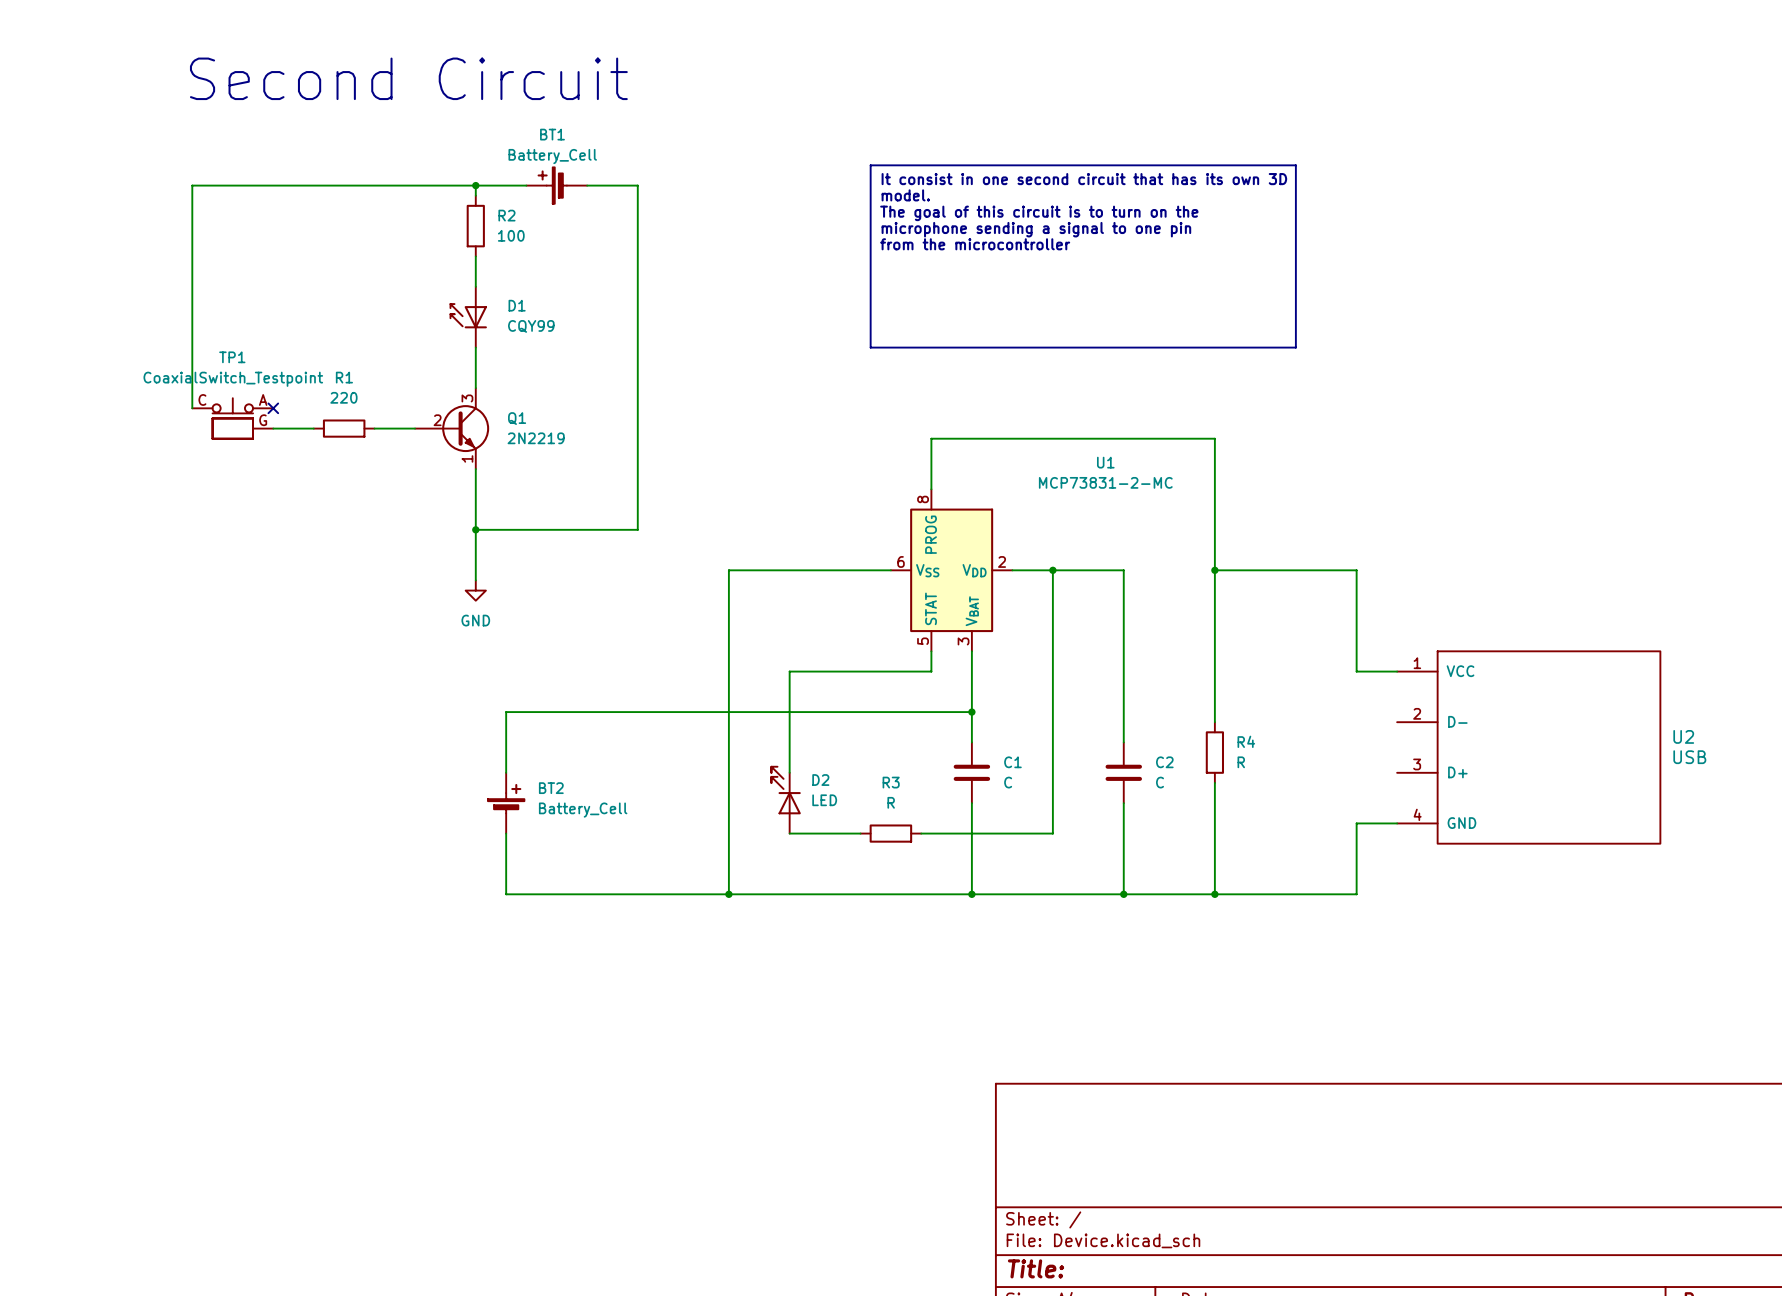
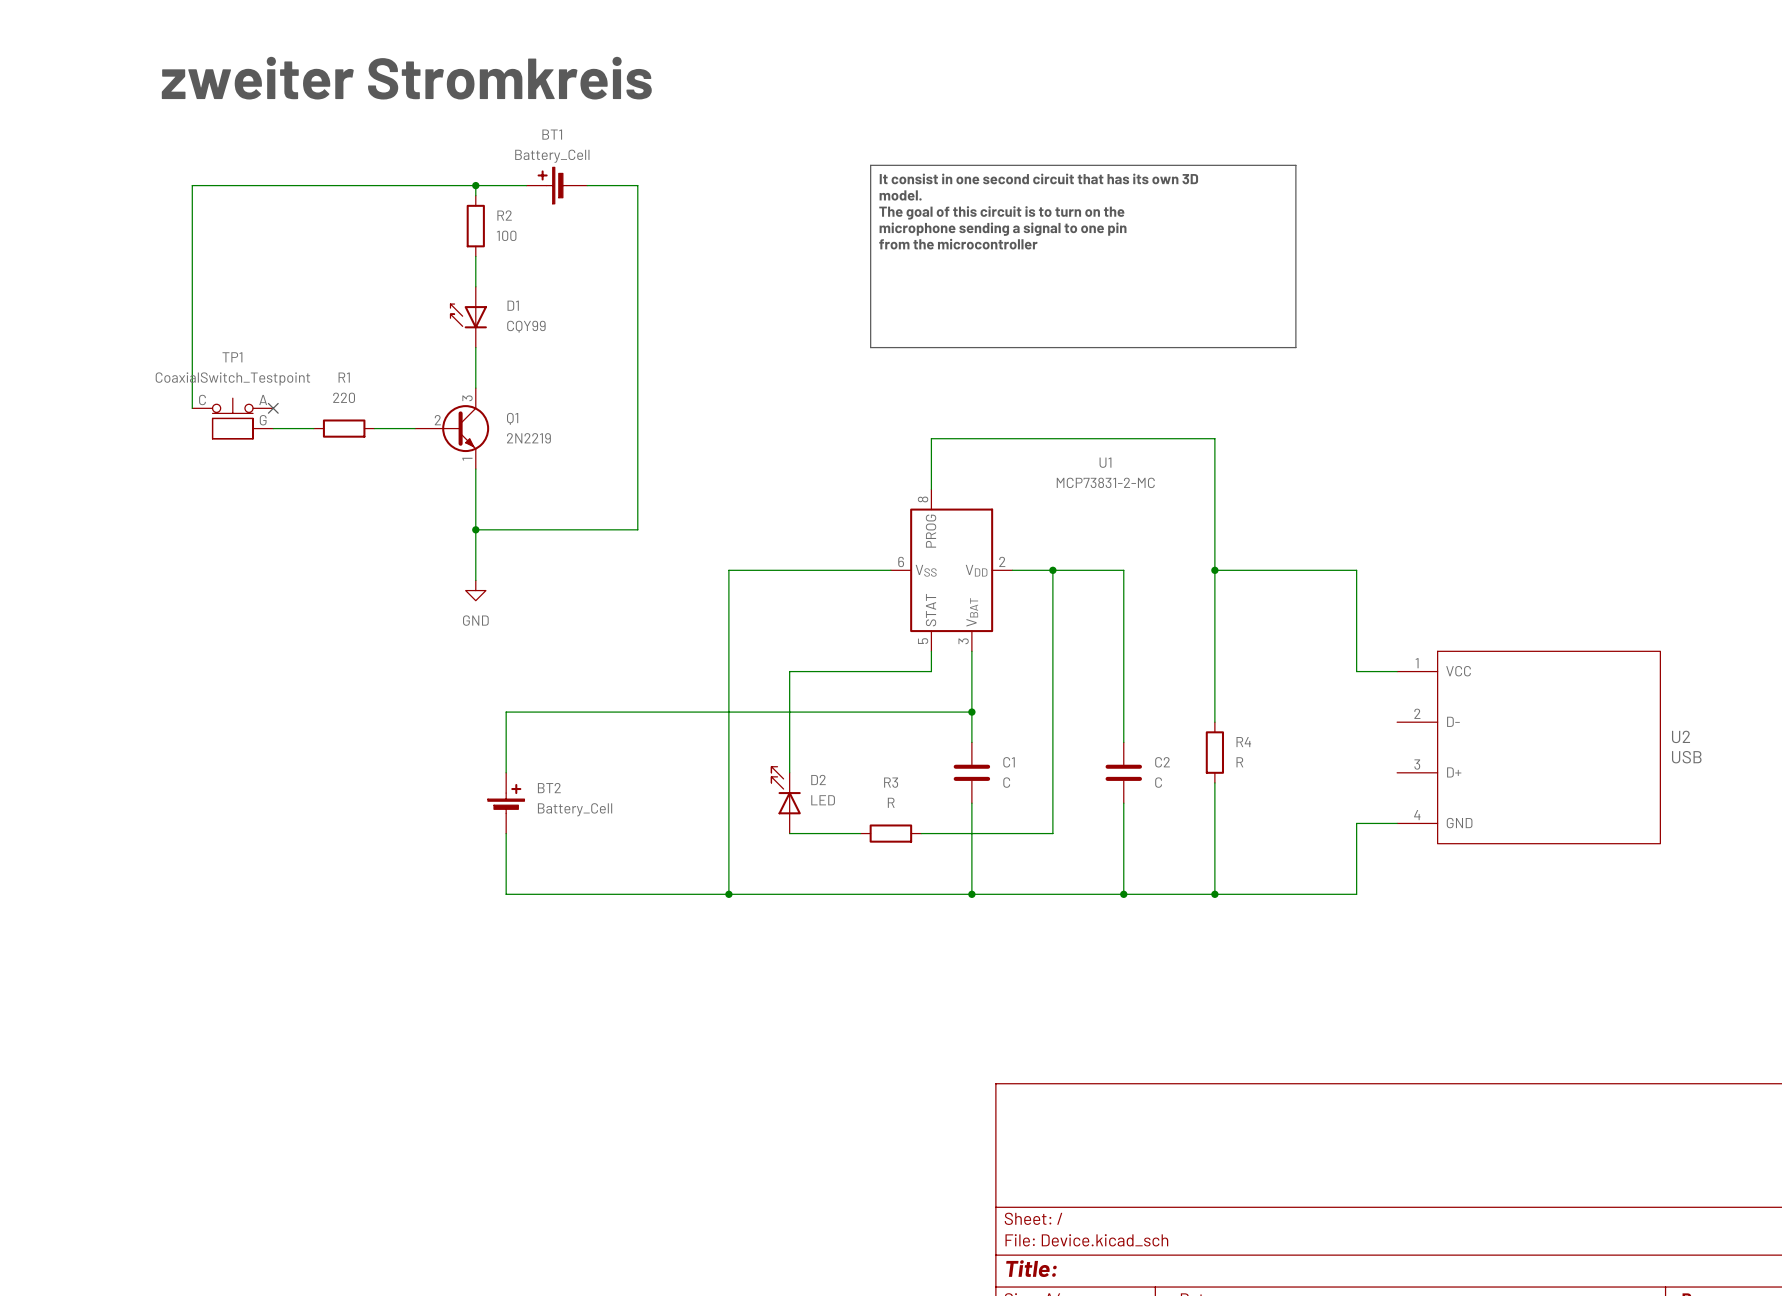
text: Second Circuit (408, 78) -> zweiter Stromkreis (406, 78)

